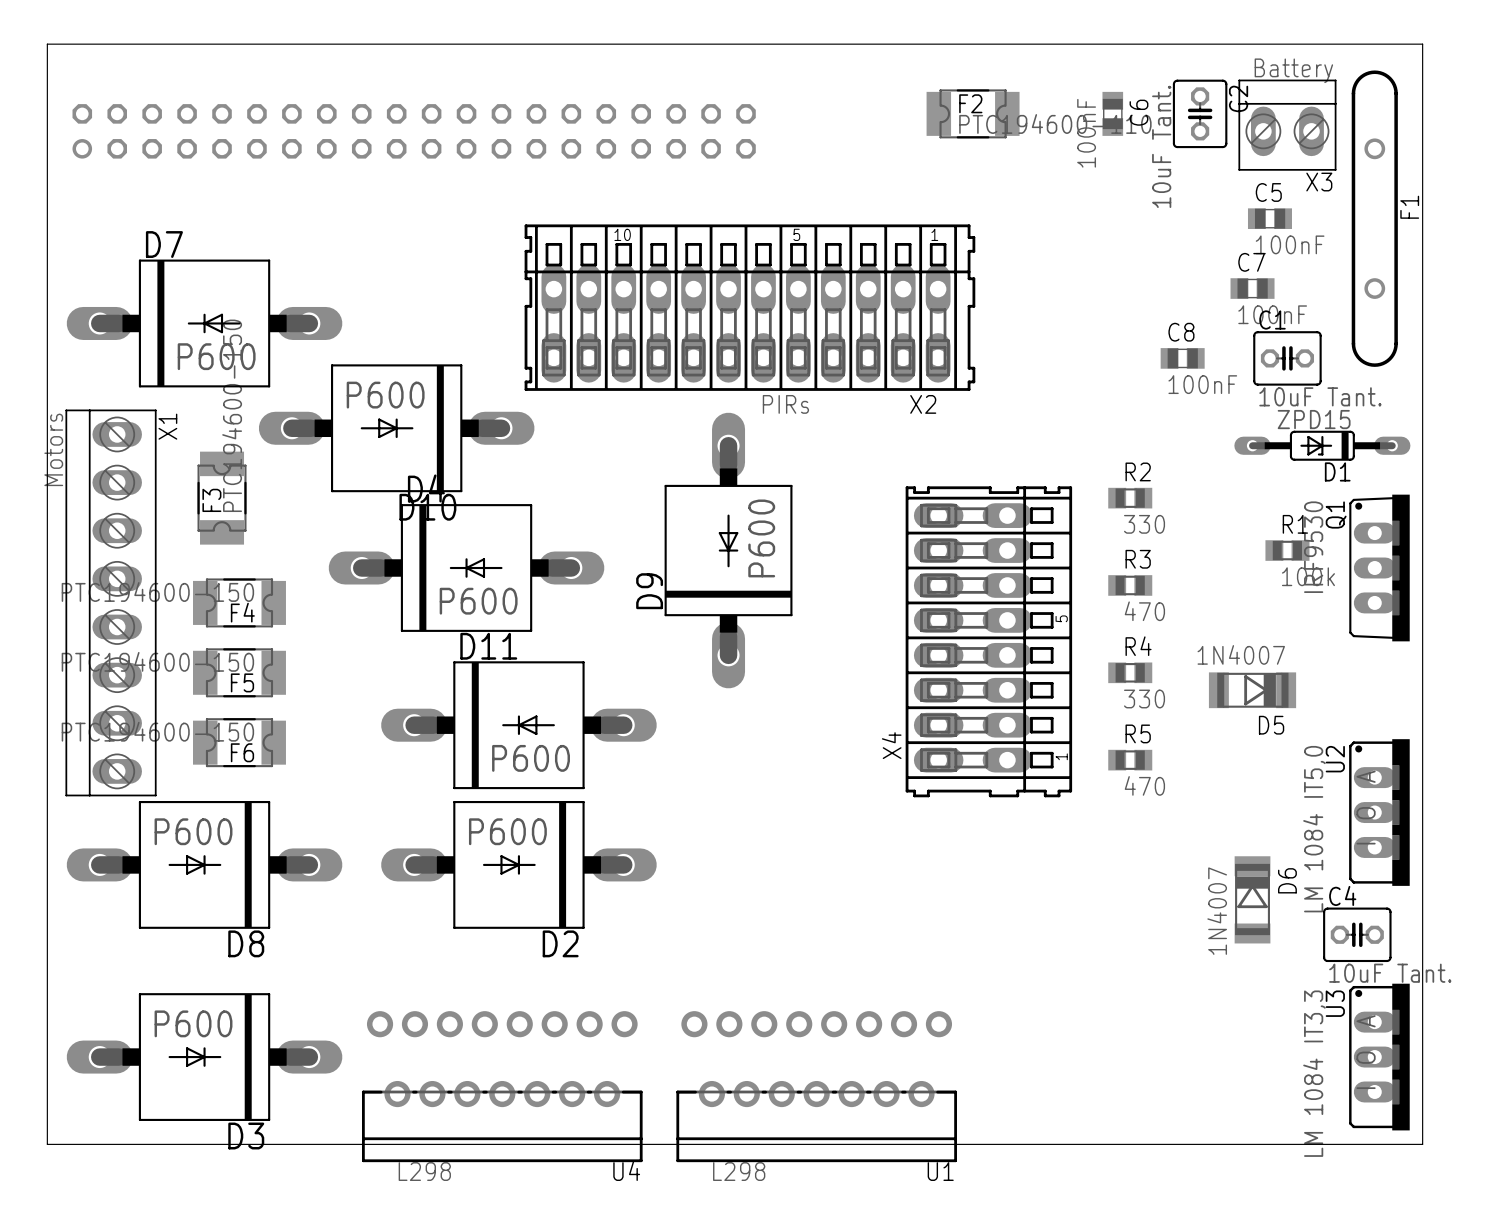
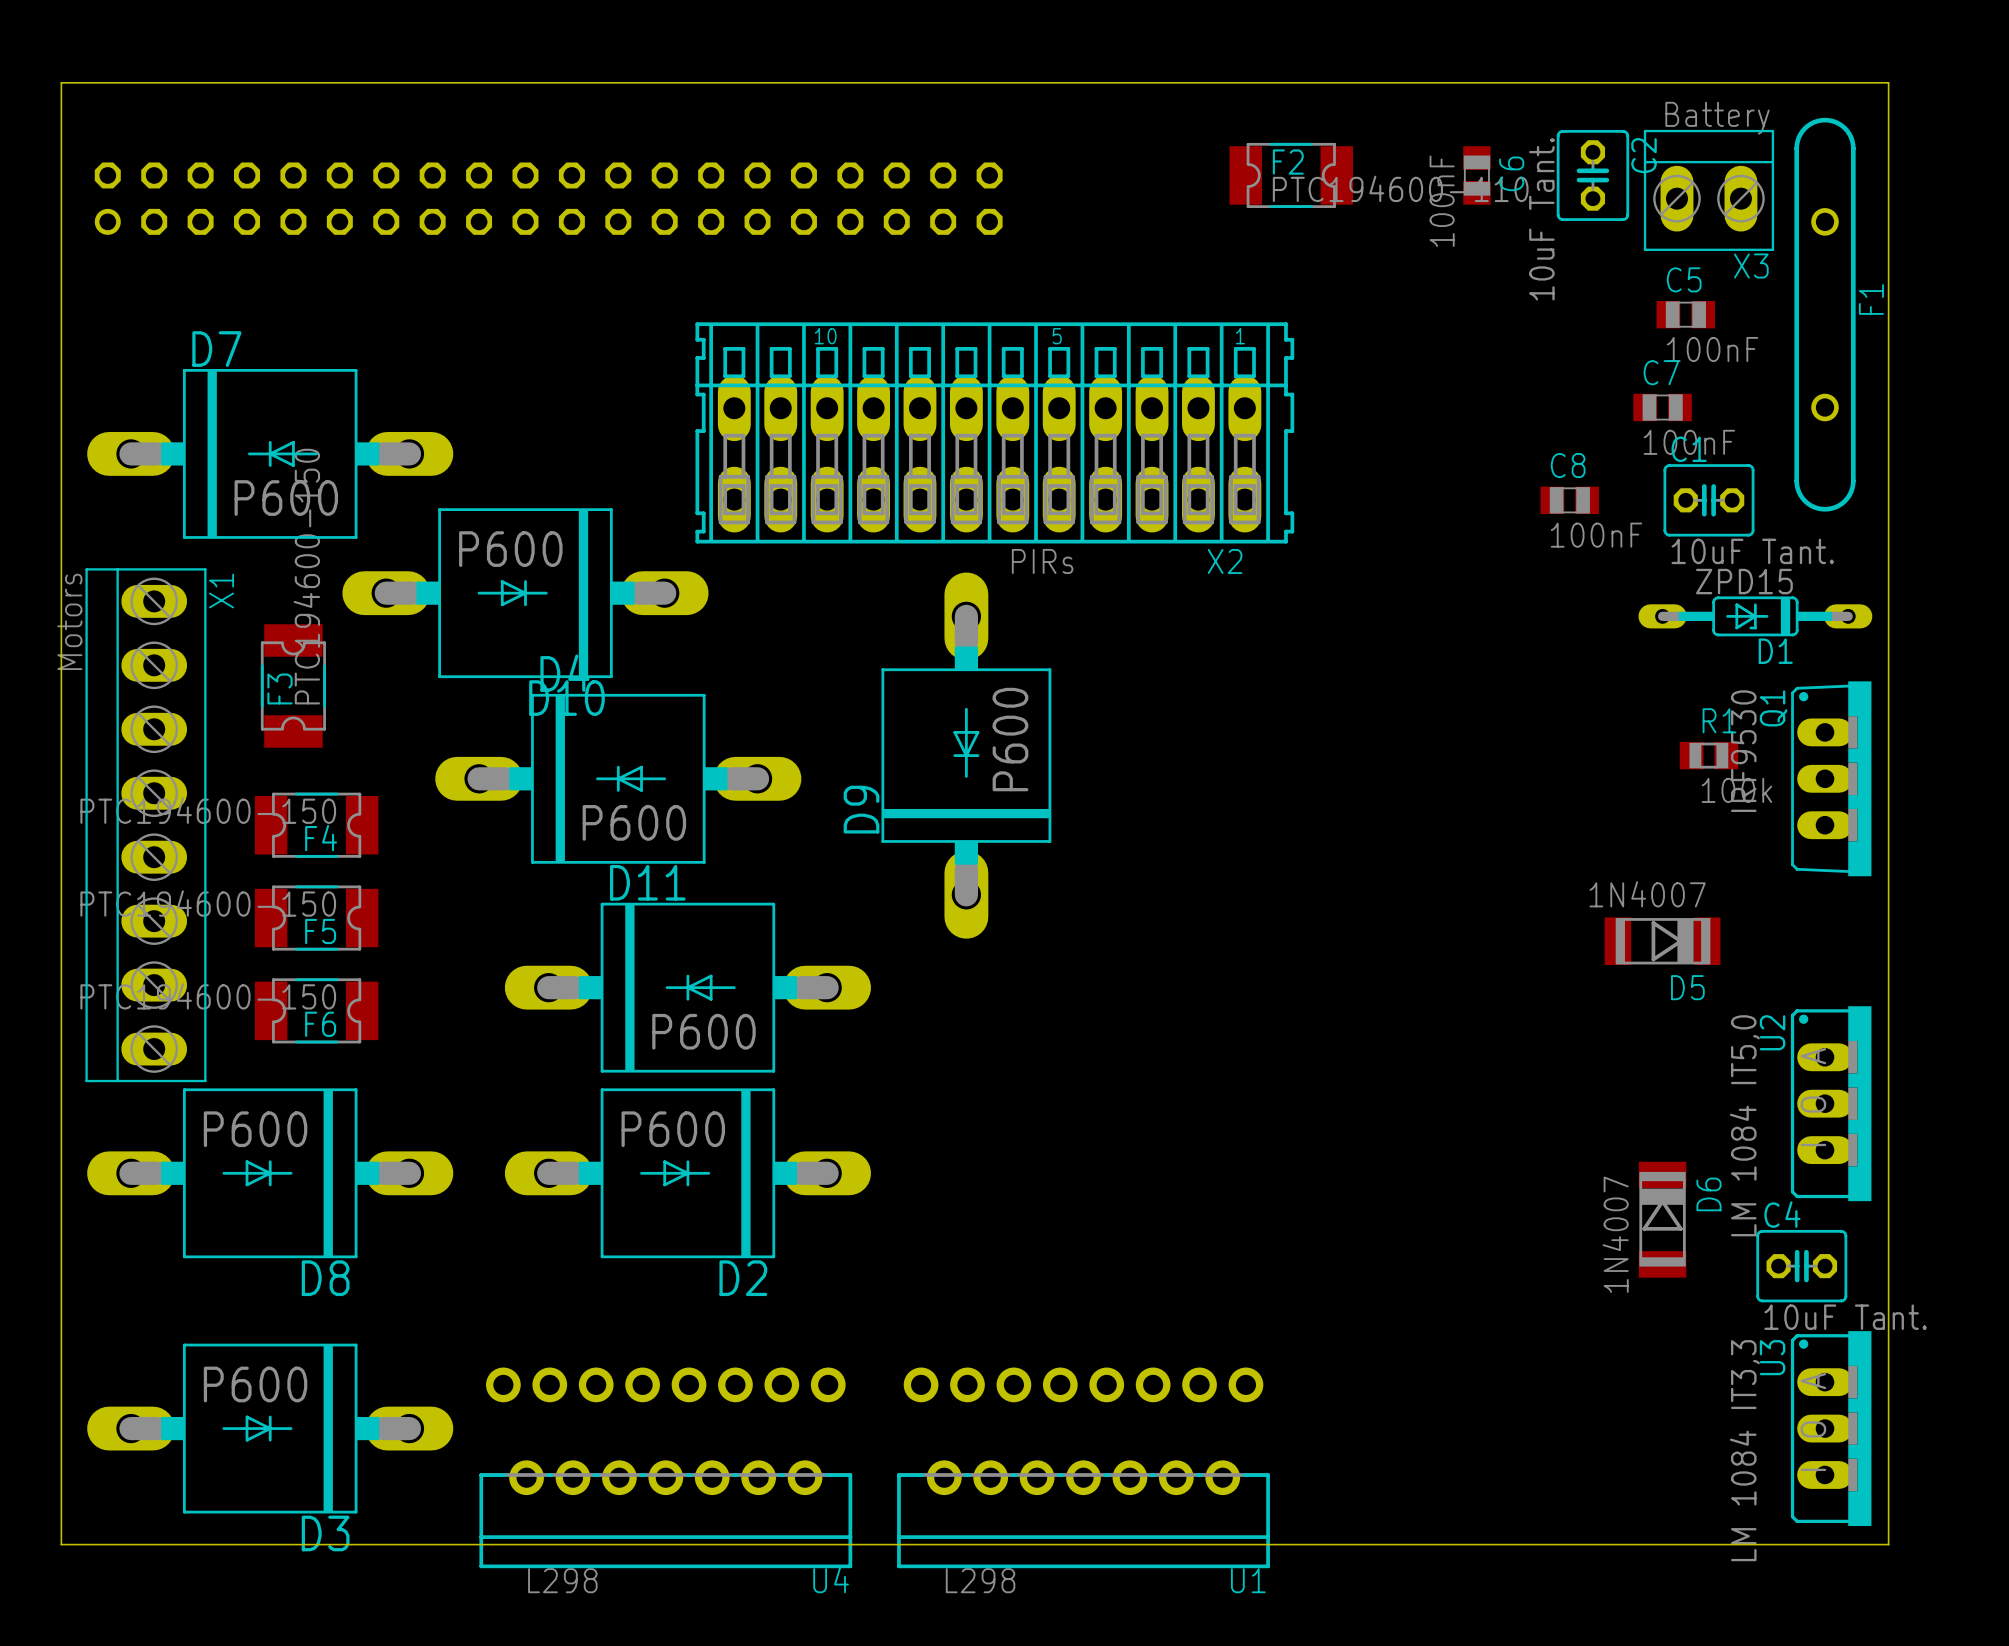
R2: 330 (1130, 498) -> none
R3: 470 (1130, 585) -> none
X4: (988, 641) -> none
R4: 330 (1130, 672) -> none
R5: 470 (1130, 760) -> none

